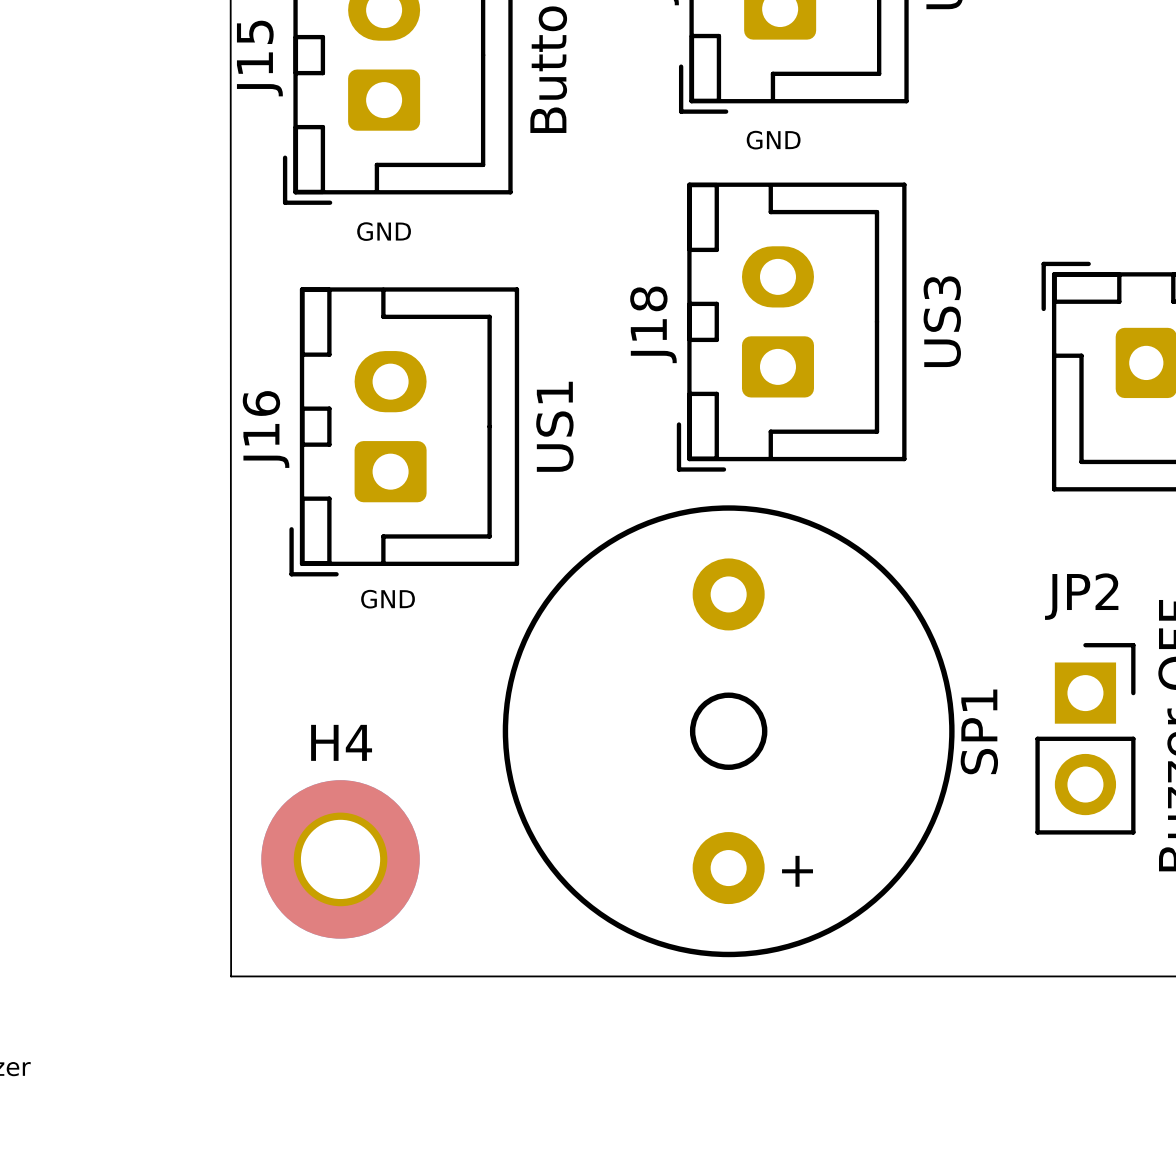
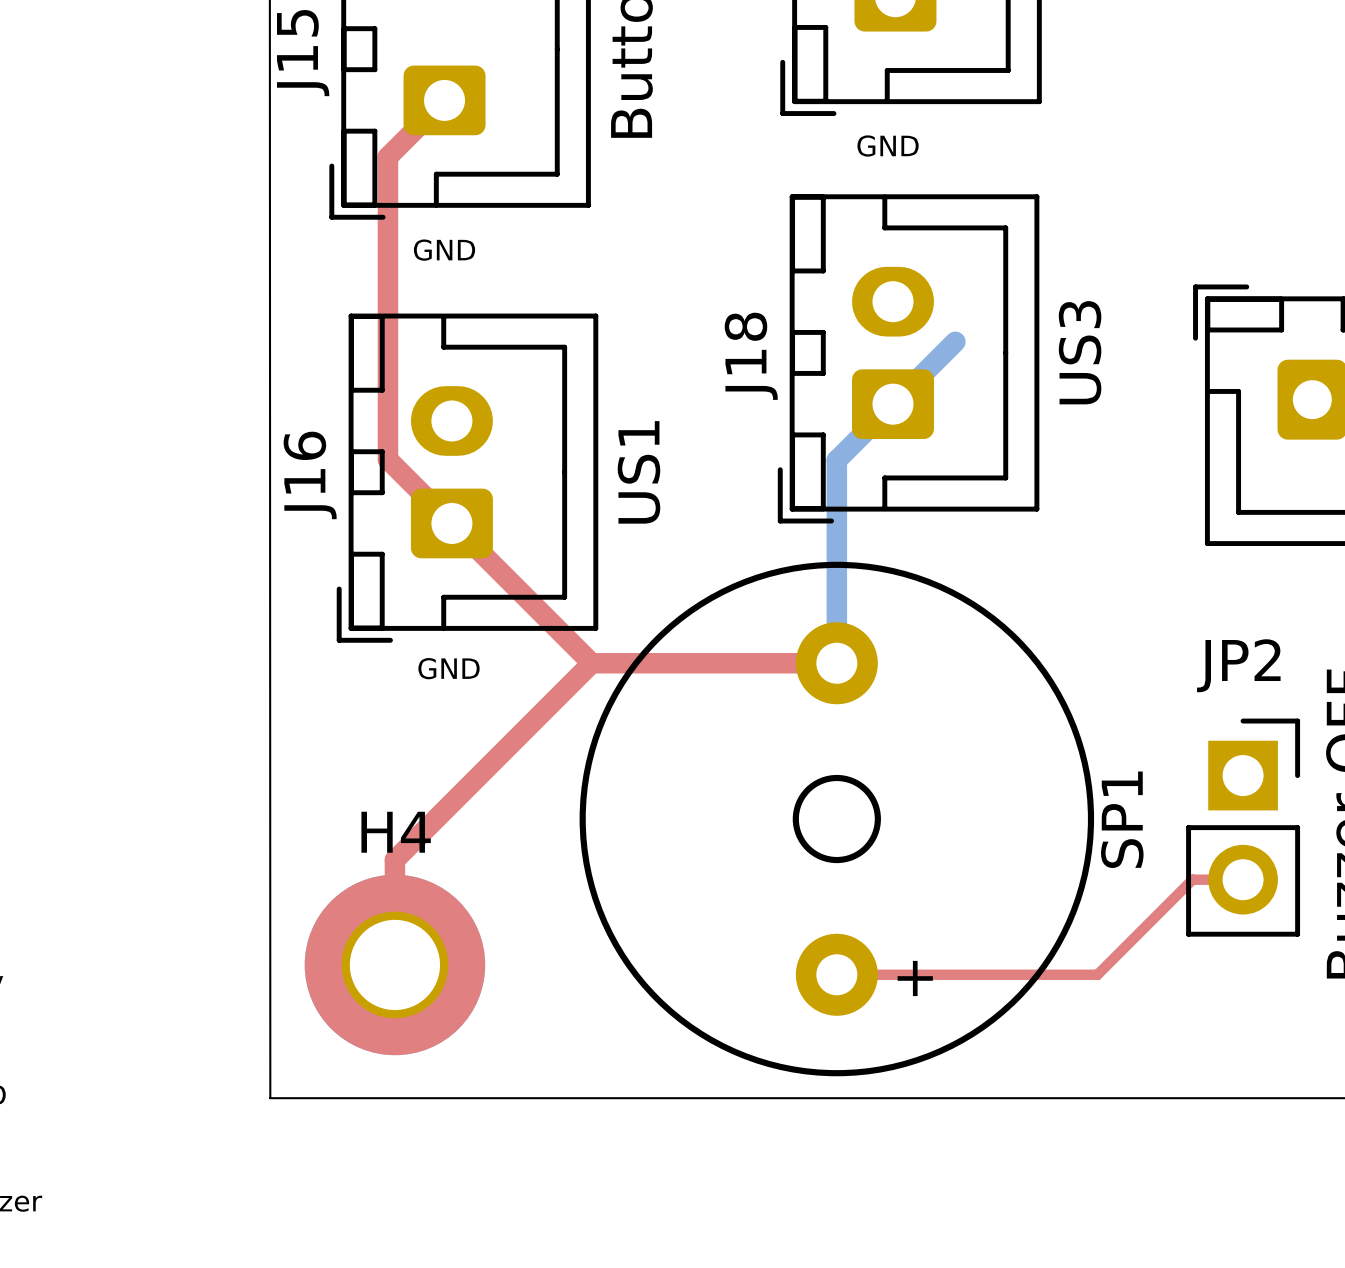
top track: none -> (444, 100) (387, 157) (387, 459) (591, 663)
bottom track: none -> (955, 341) (836, 460) (836, 663)
top track: none -> (591, 663) (836, 663)
top track: none -> (591, 663) (394, 860) (394, 964)
top track: none -> (1243, 879) (1192, 879) (1097, 974) (836, 974)

